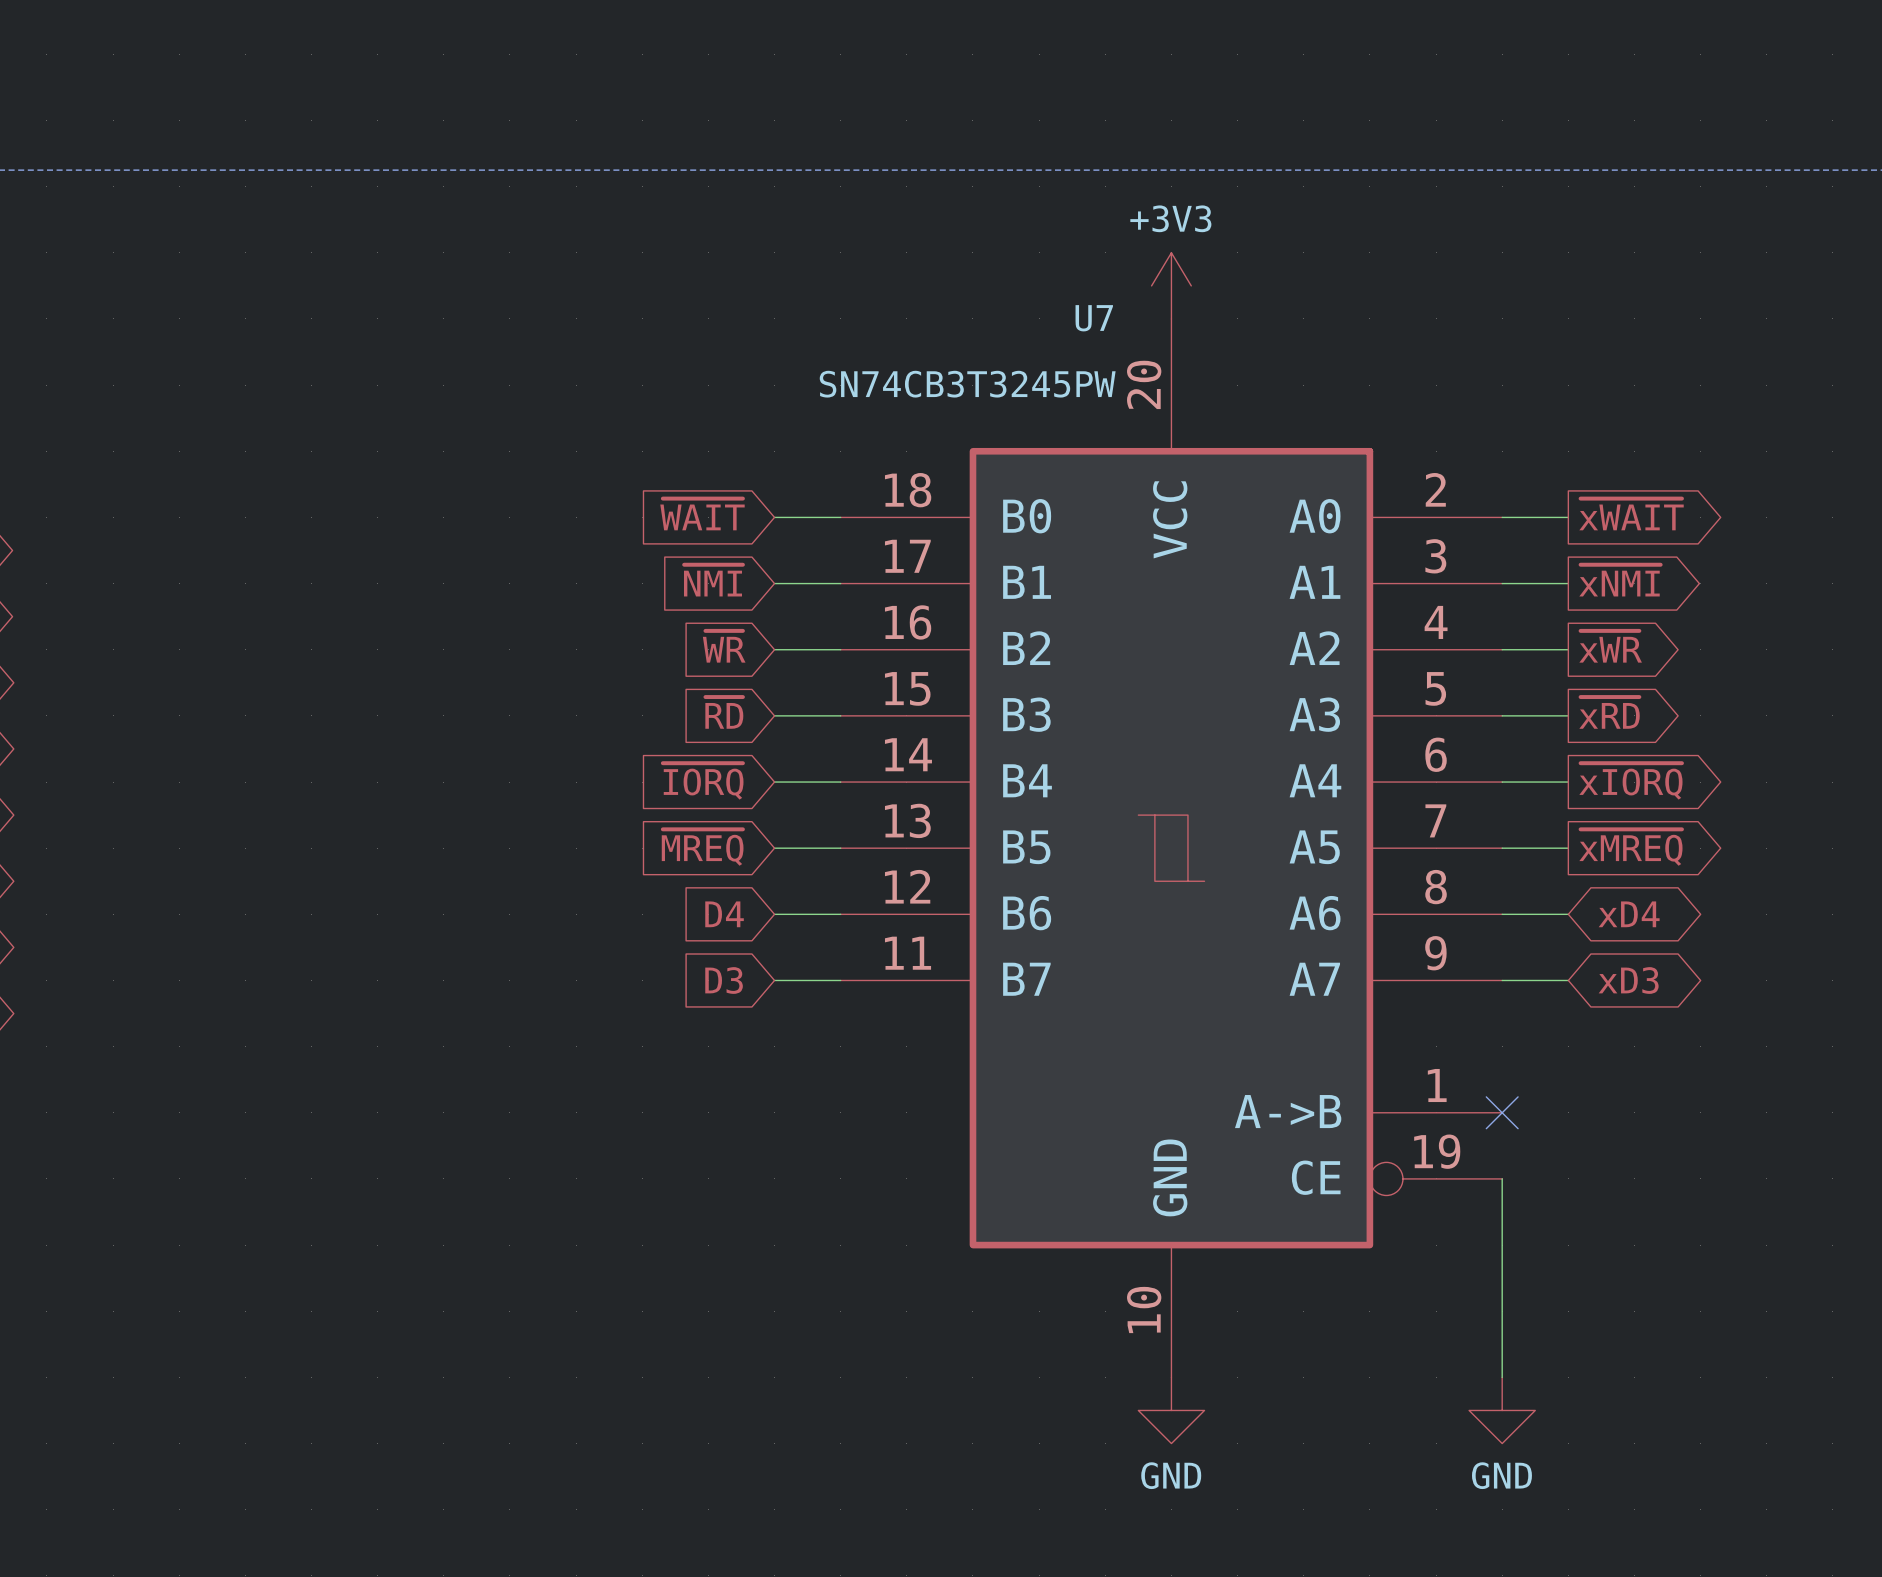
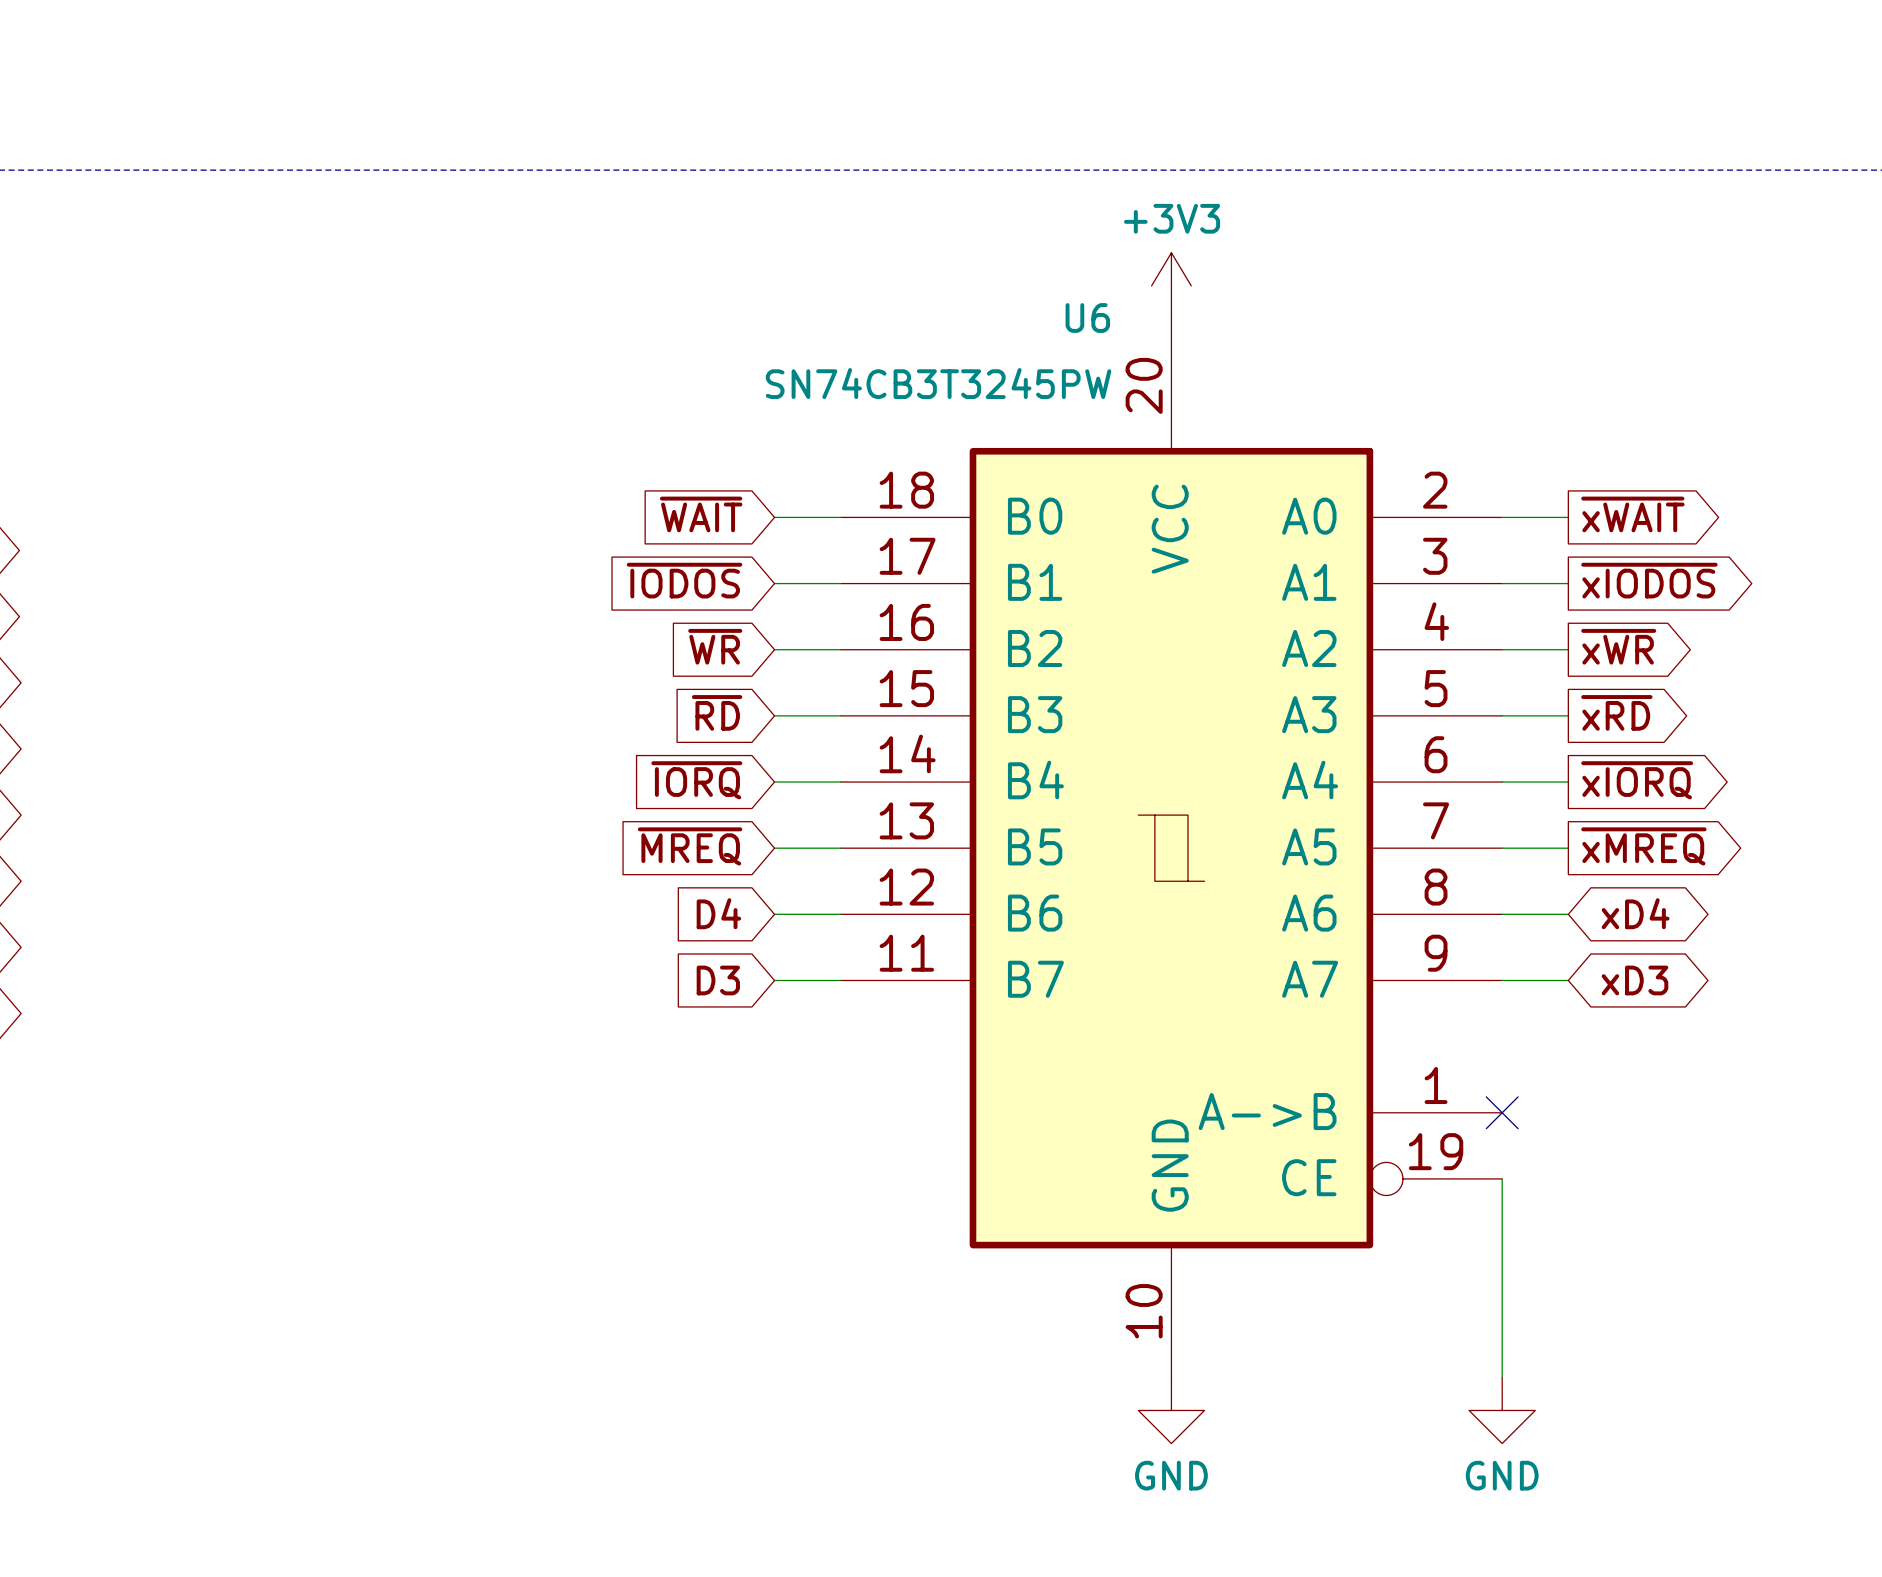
U7 name: U7 (1094, 318) -> U6 (1087, 318)
global label: ~{NMI} (713, 580) -> ~{IODOS} (684, 580)
global label: ~{xNMI} (1619, 580) -> ~{xIODOS} (1649, 580)

